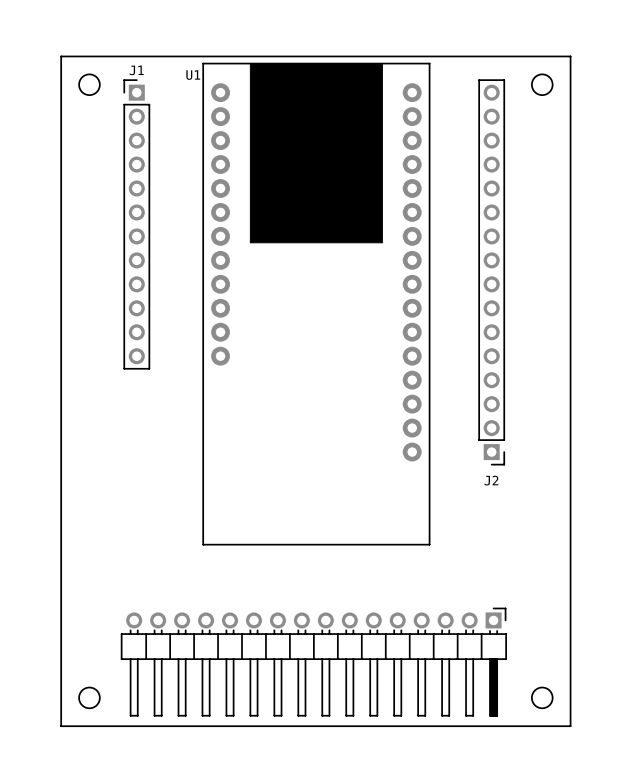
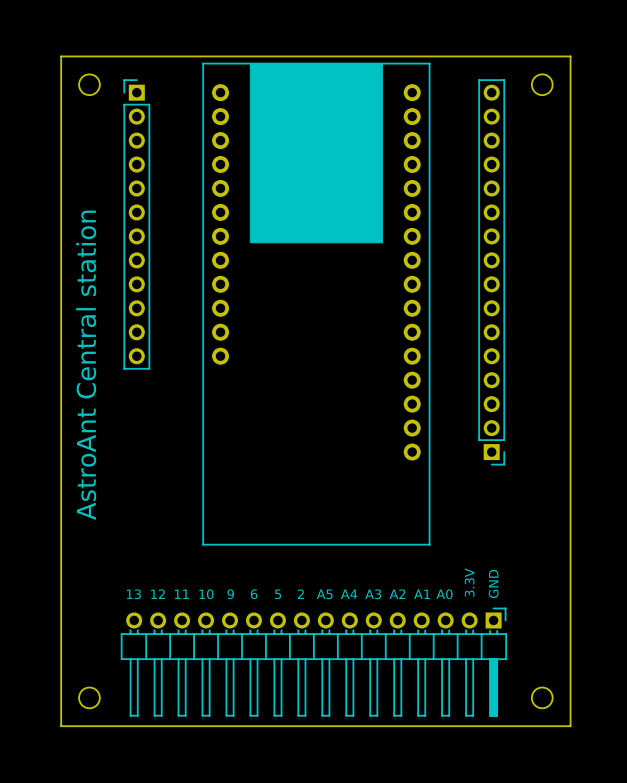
J1 name: J1 (136, 70) -> none
U1: (316, 304) -> none
part: none -> (316, 304)
text: none -> AstroAnt Central station (86, 365)
J2 name: J2 (491, 480) -> none
text: none -> 3.3V (469, 582)
text: none -> GND (493, 583)
text: none -> 13 (133, 594)
text: none -> 12 (158, 594)
text: none -> 11 (181, 594)
text: none -> 10 (206, 594)
text: none -> 9 (230, 594)
text: none -> 6 (254, 594)
text: none -> 5 (278, 594)
text: none -> 2 (300, 594)
text: none -> A5 (324, 594)
text: none -> A4 (349, 594)
text: none -> A3 (373, 594)
text: none -> A2 (397, 594)
text: none -> A1 (422, 594)
text: none -> A0 (444, 594)

